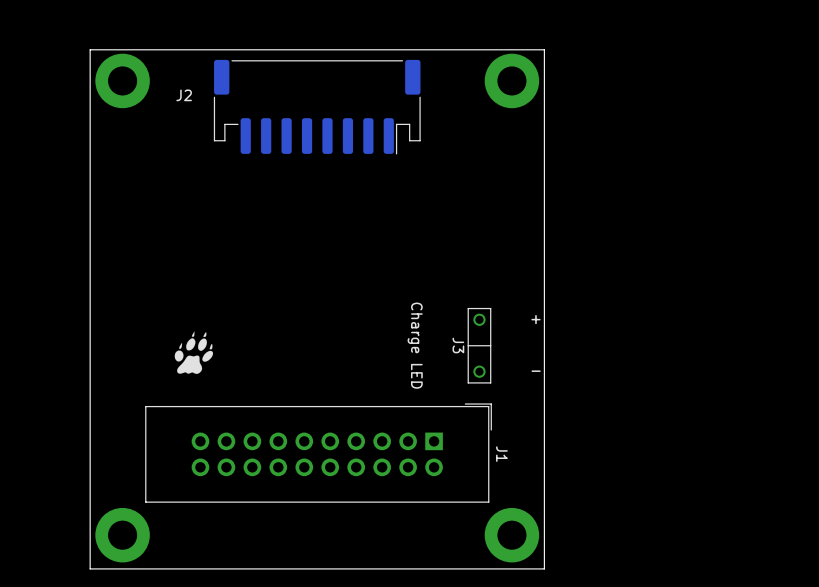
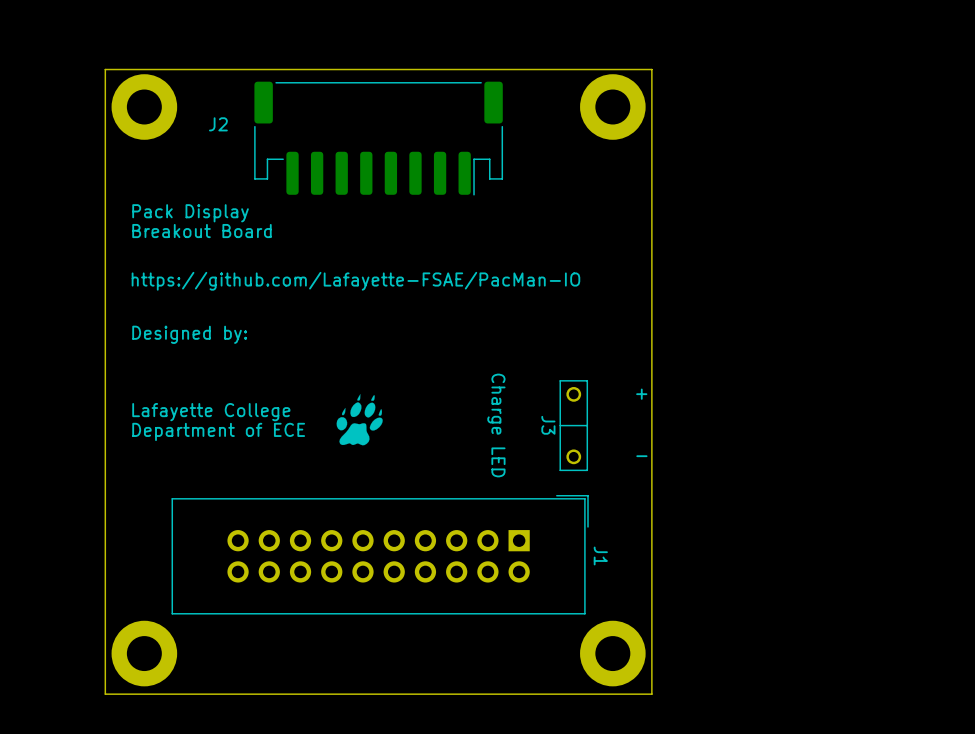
text: none -> Pack Display (190, 213)
text: none -> Breakout Board (201, 231)
text: none -> https://github.com/Lafayette-FSAE/PacMan-IO (355, 281)
text: none -> Designed by: (189, 334)
text: none -> Lafayette College (211, 412)
text: none -> Department of ECE (218, 431)
drawing position: (193, 352) -> (359, 419)

